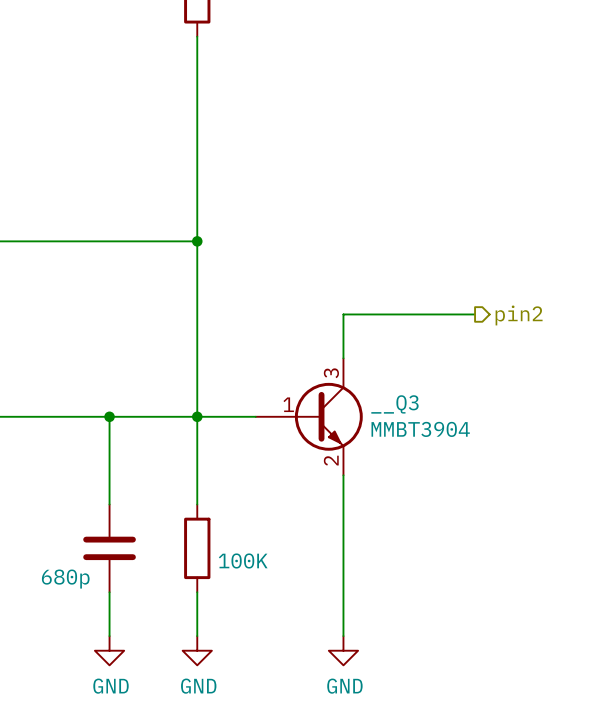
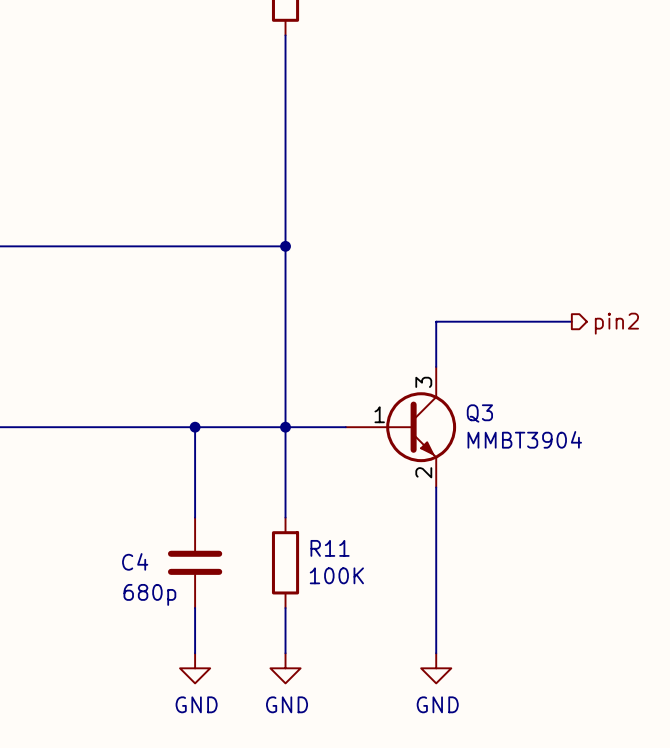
__Q3 name: __Q3 (394, 404) -> Q3 (479, 413)
R11 name: none -> R11 (330, 548)
C4 name: none -> C4 (135, 561)

